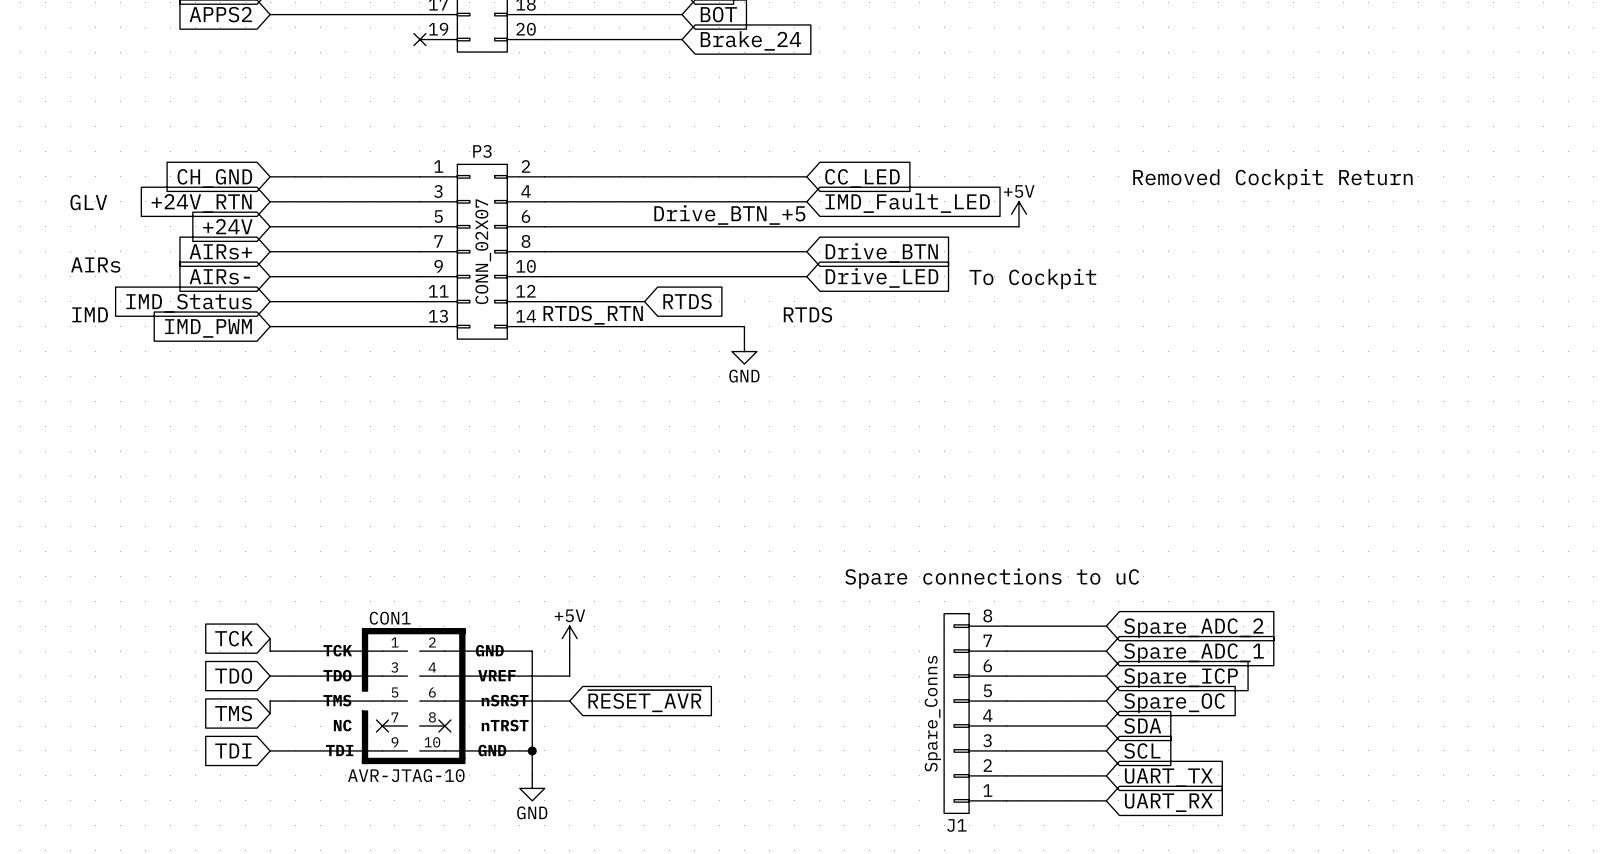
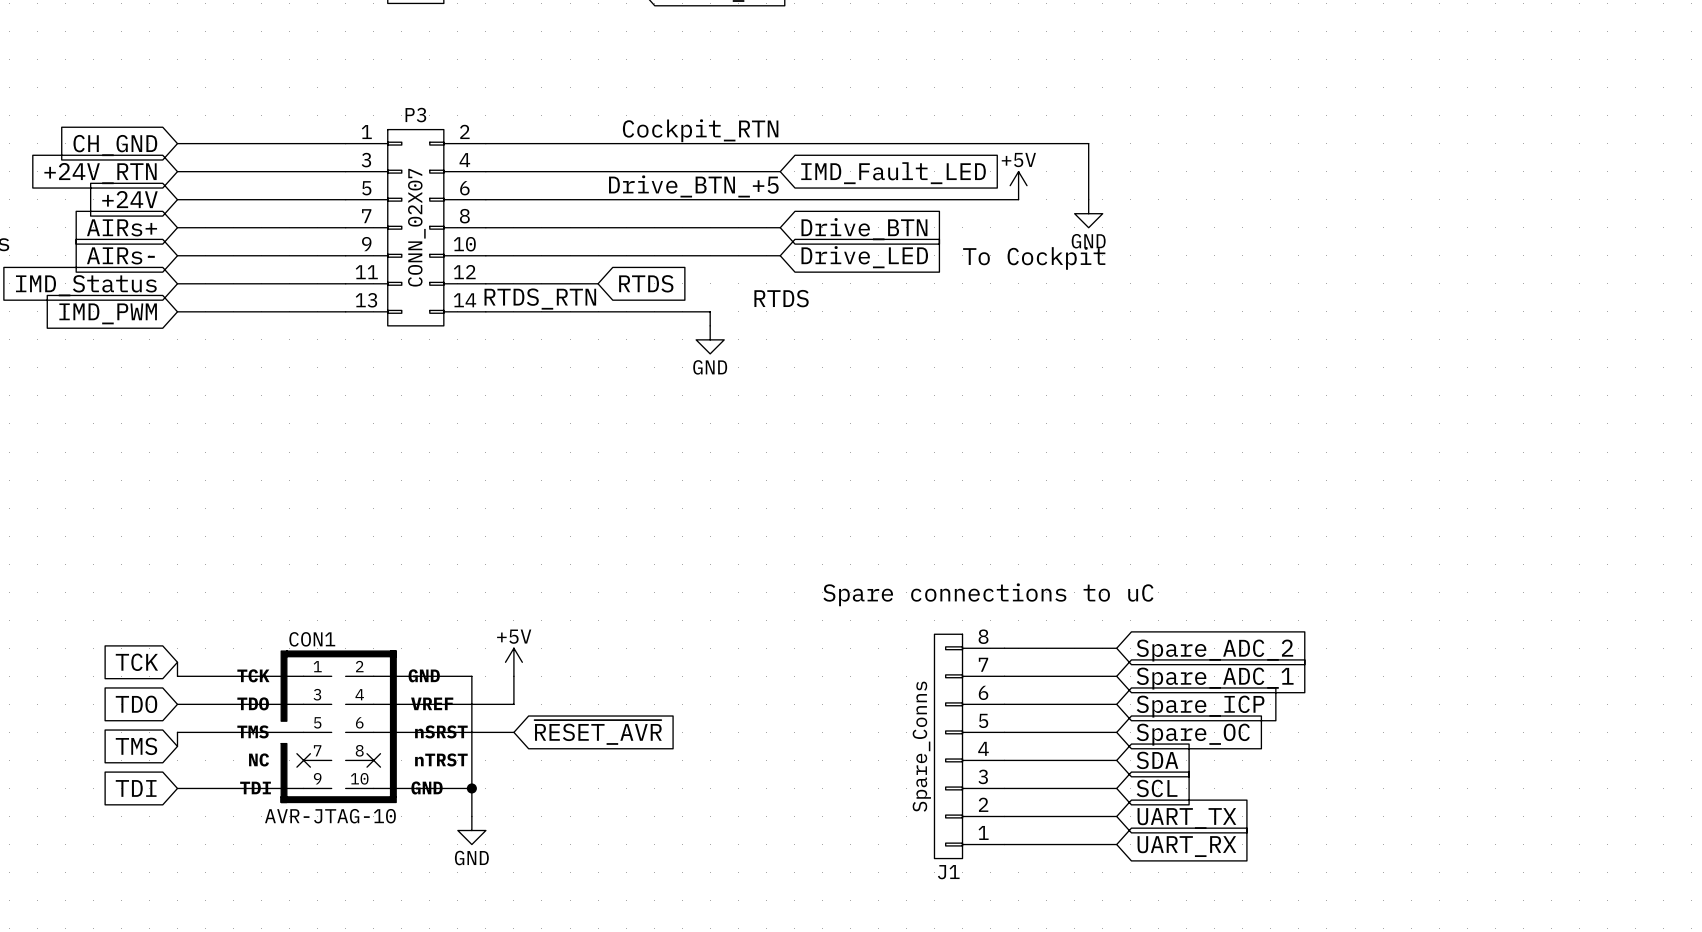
label: none -> Cockpit_RTN (700, 130)
wire: none -> (780, 143) (1088, 143) (1088, 199)
global label: CC_LED (862, 178) -> none
text: Removed Cockpit Return (1272, 179) -> none
power symbol: none -> GND (1088, 213)

